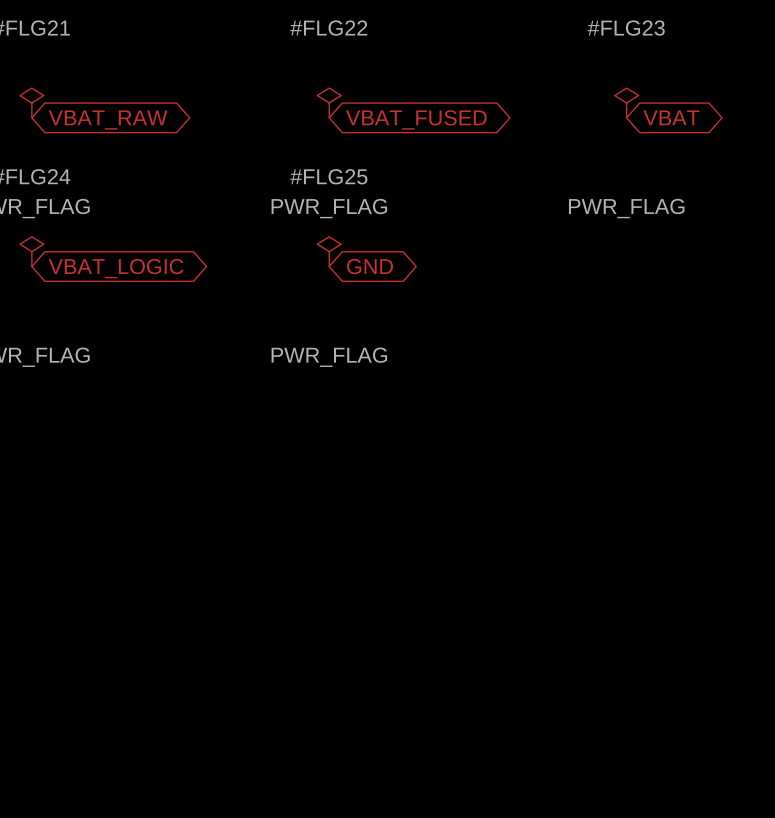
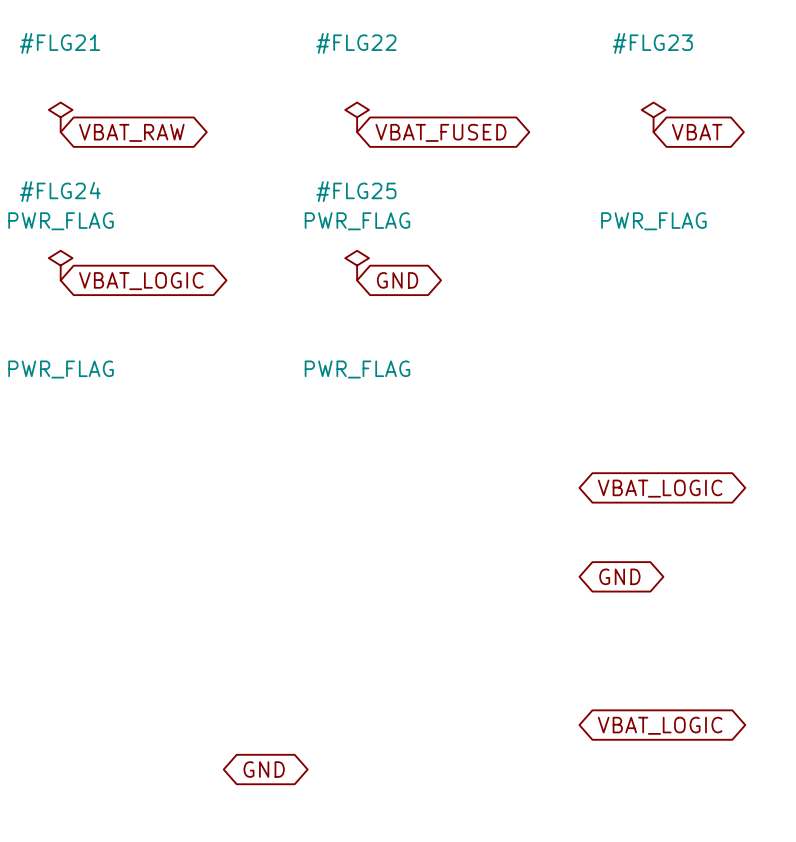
global label: none -> VBAT_LOGIC (660, 488)
global label: none -> GND (619, 576)
global label: none -> VBAT_LOGIC (660, 725)
global label: none -> GND (264, 769)

